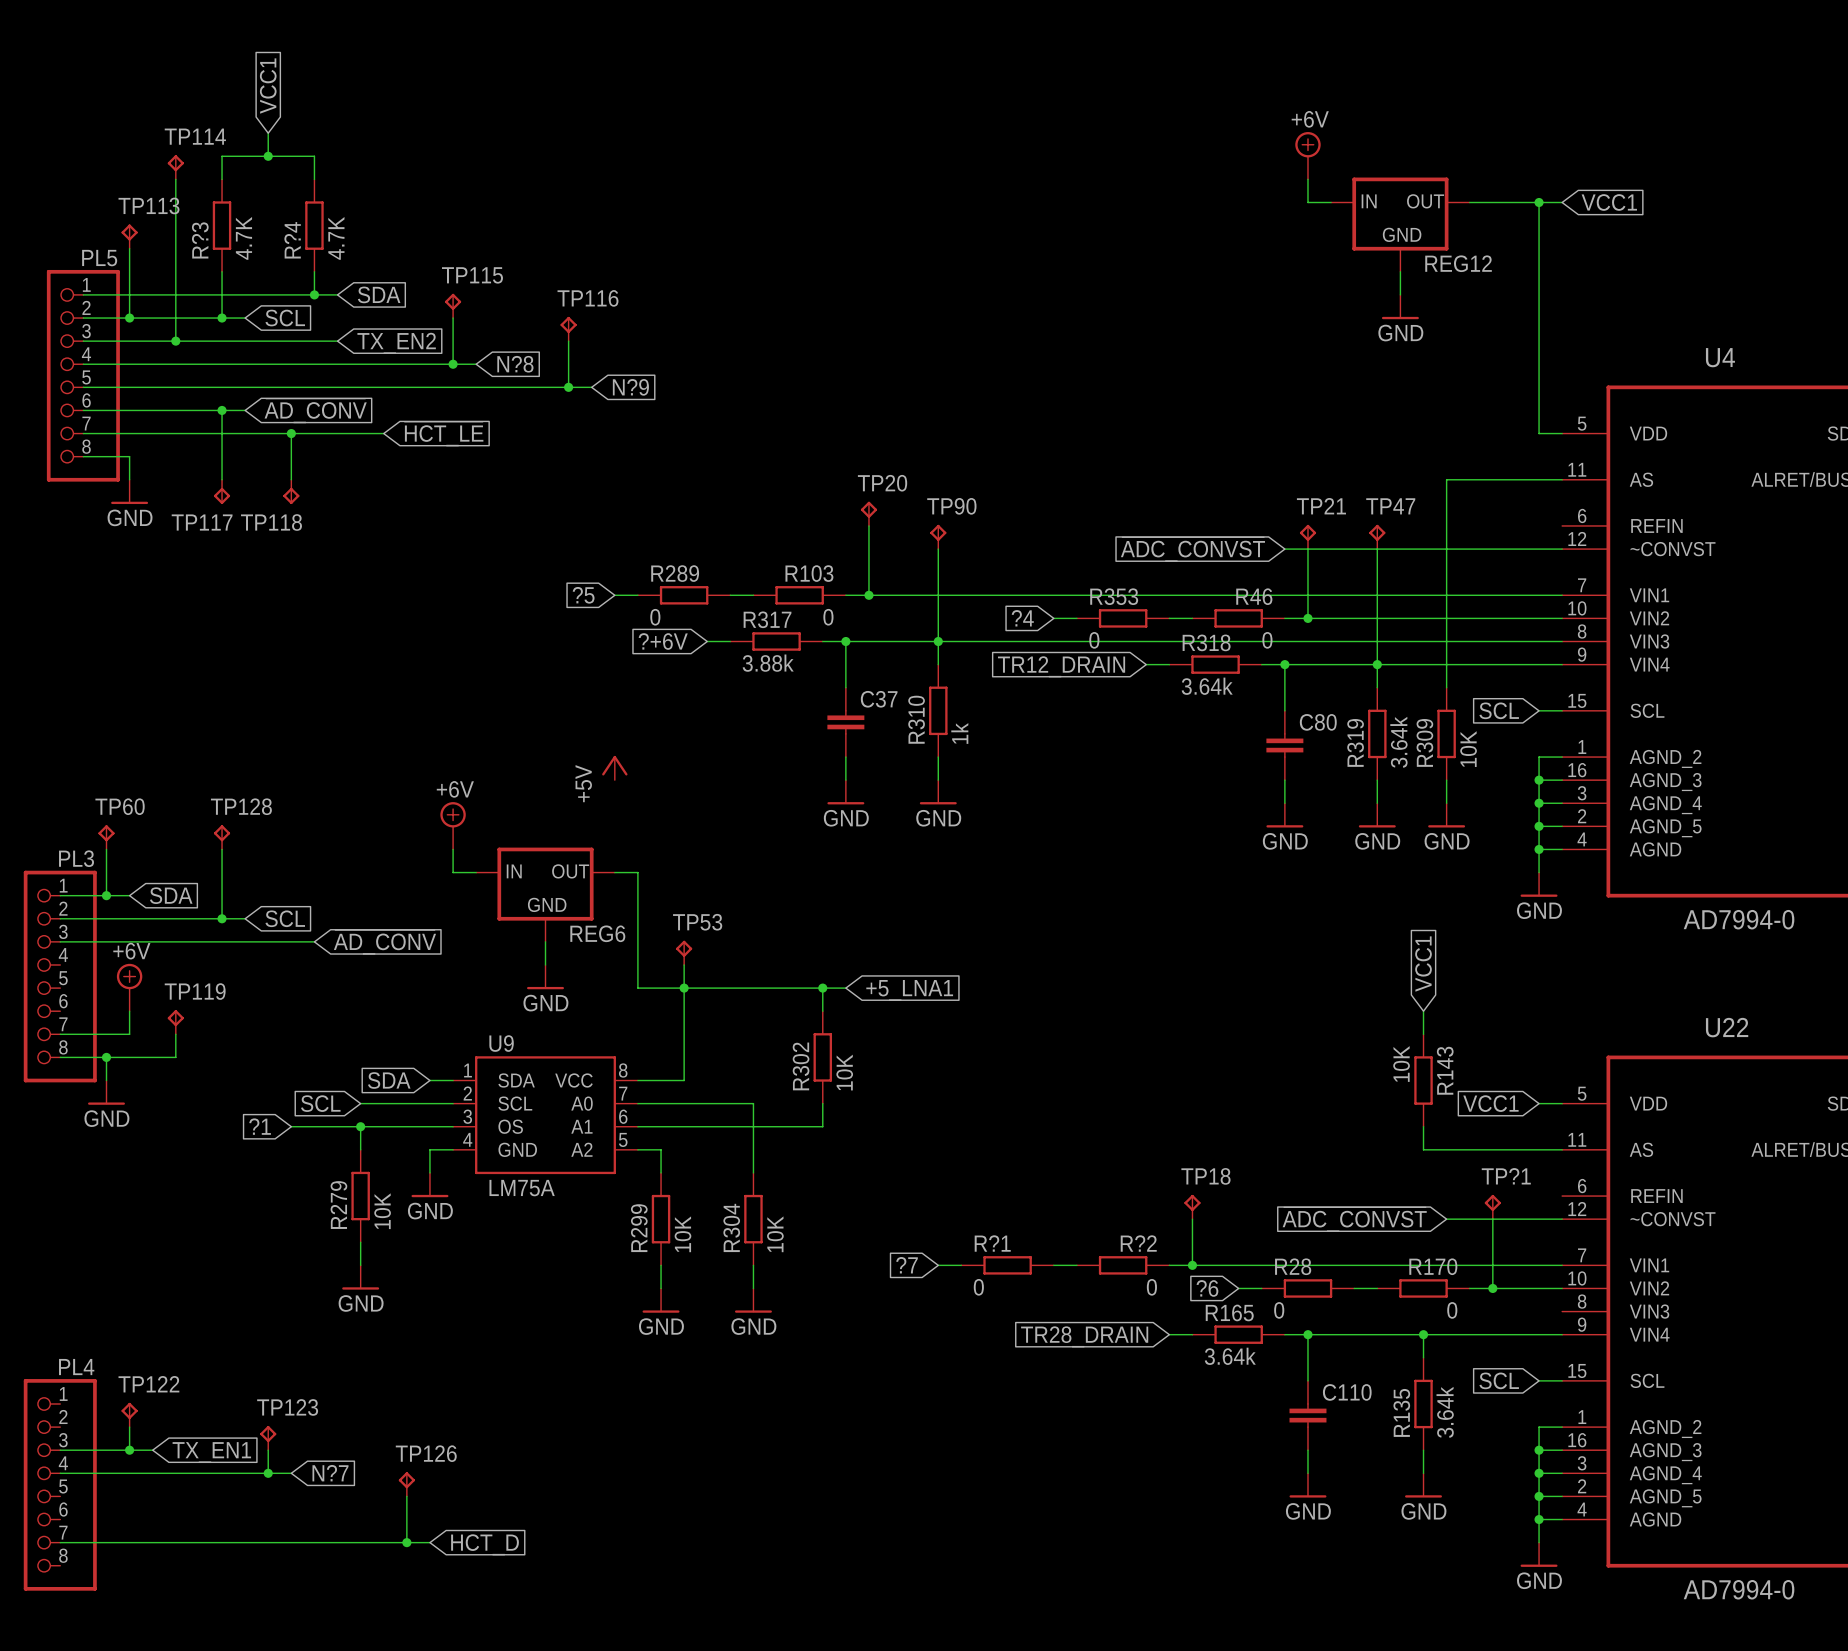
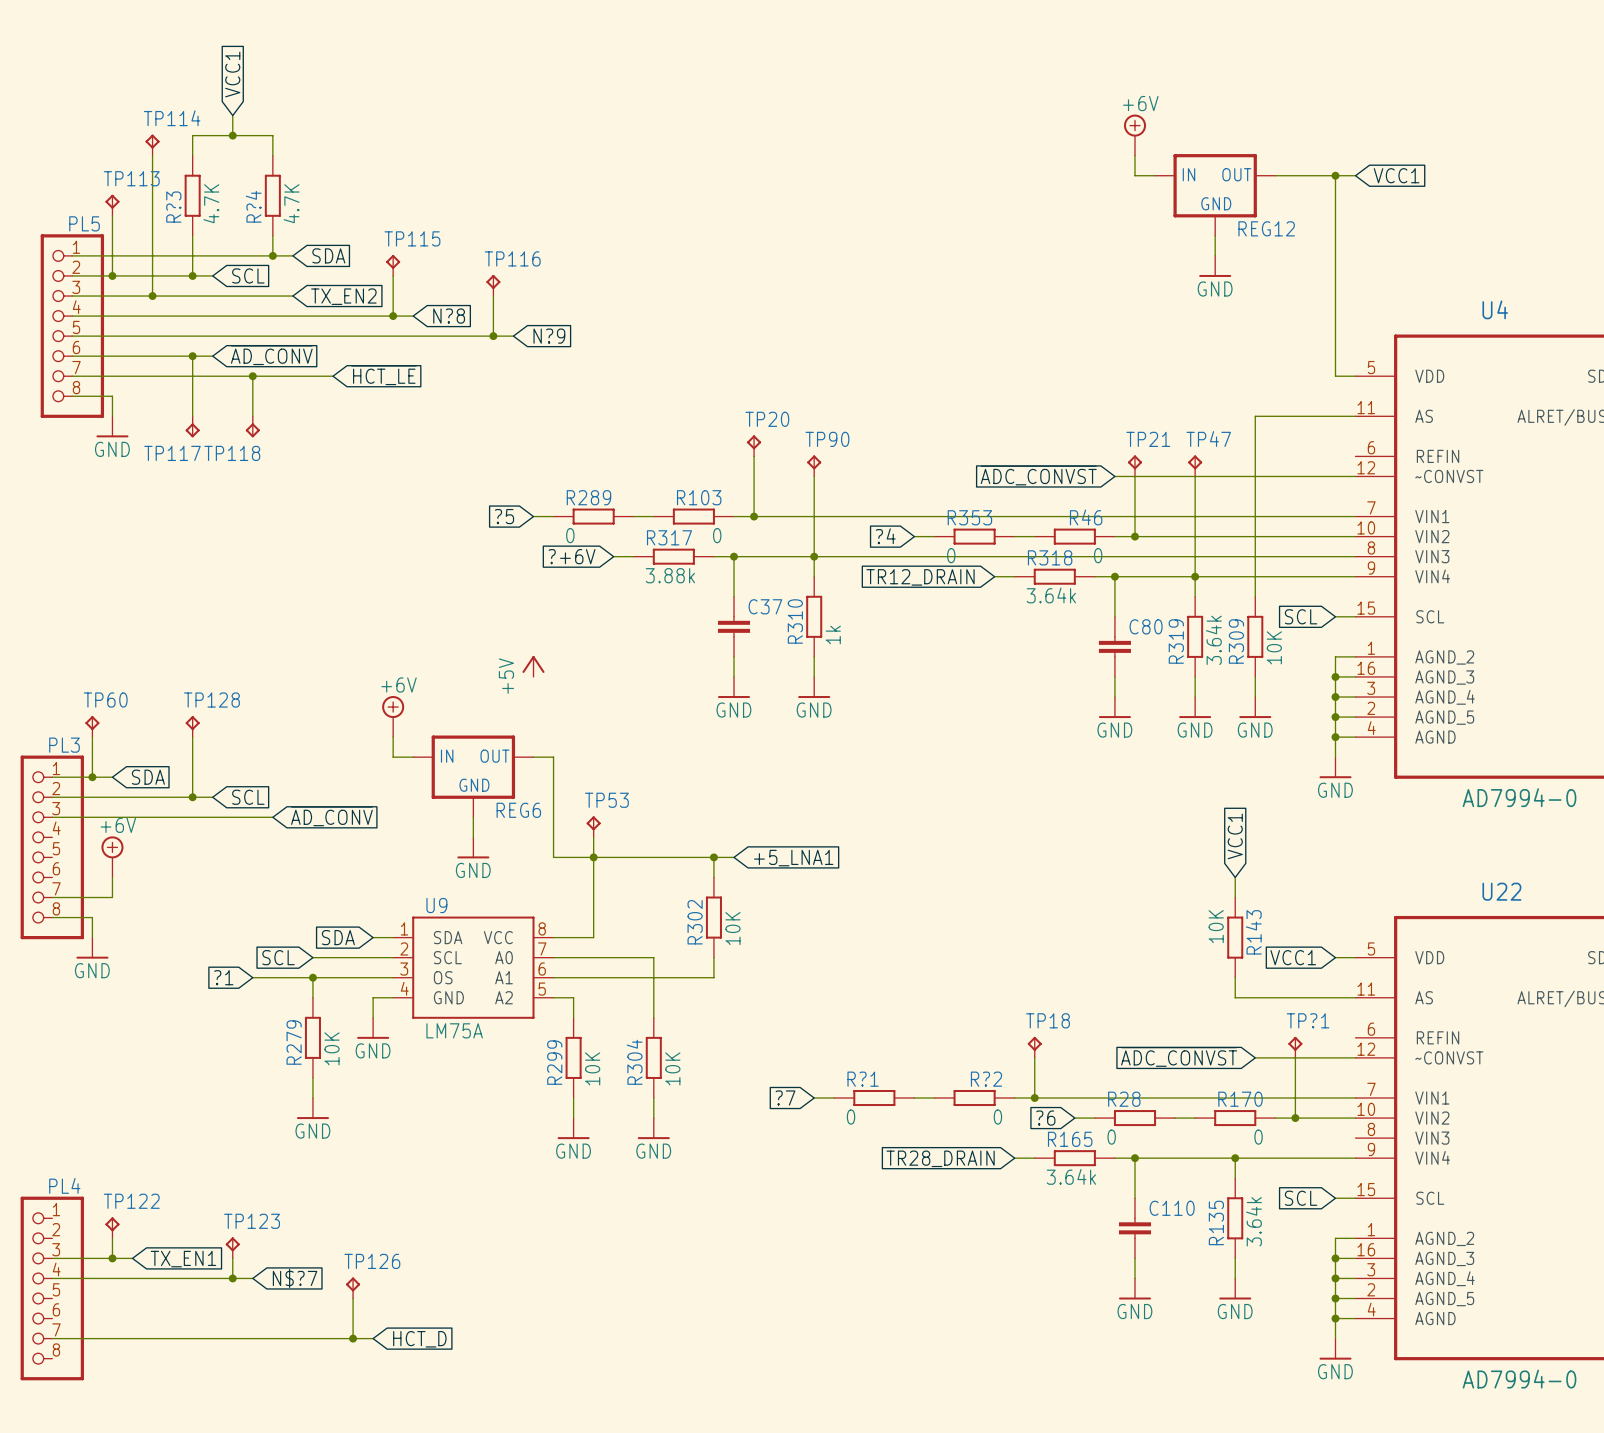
TP119: (175, 1022) -> none
wire: (175, 1034) (175, 1057) (106, 1057) -> none
junction: (106, 1057) -> none
global label: N?7 (330, 1473) -> N$?7 (295, 1278)

